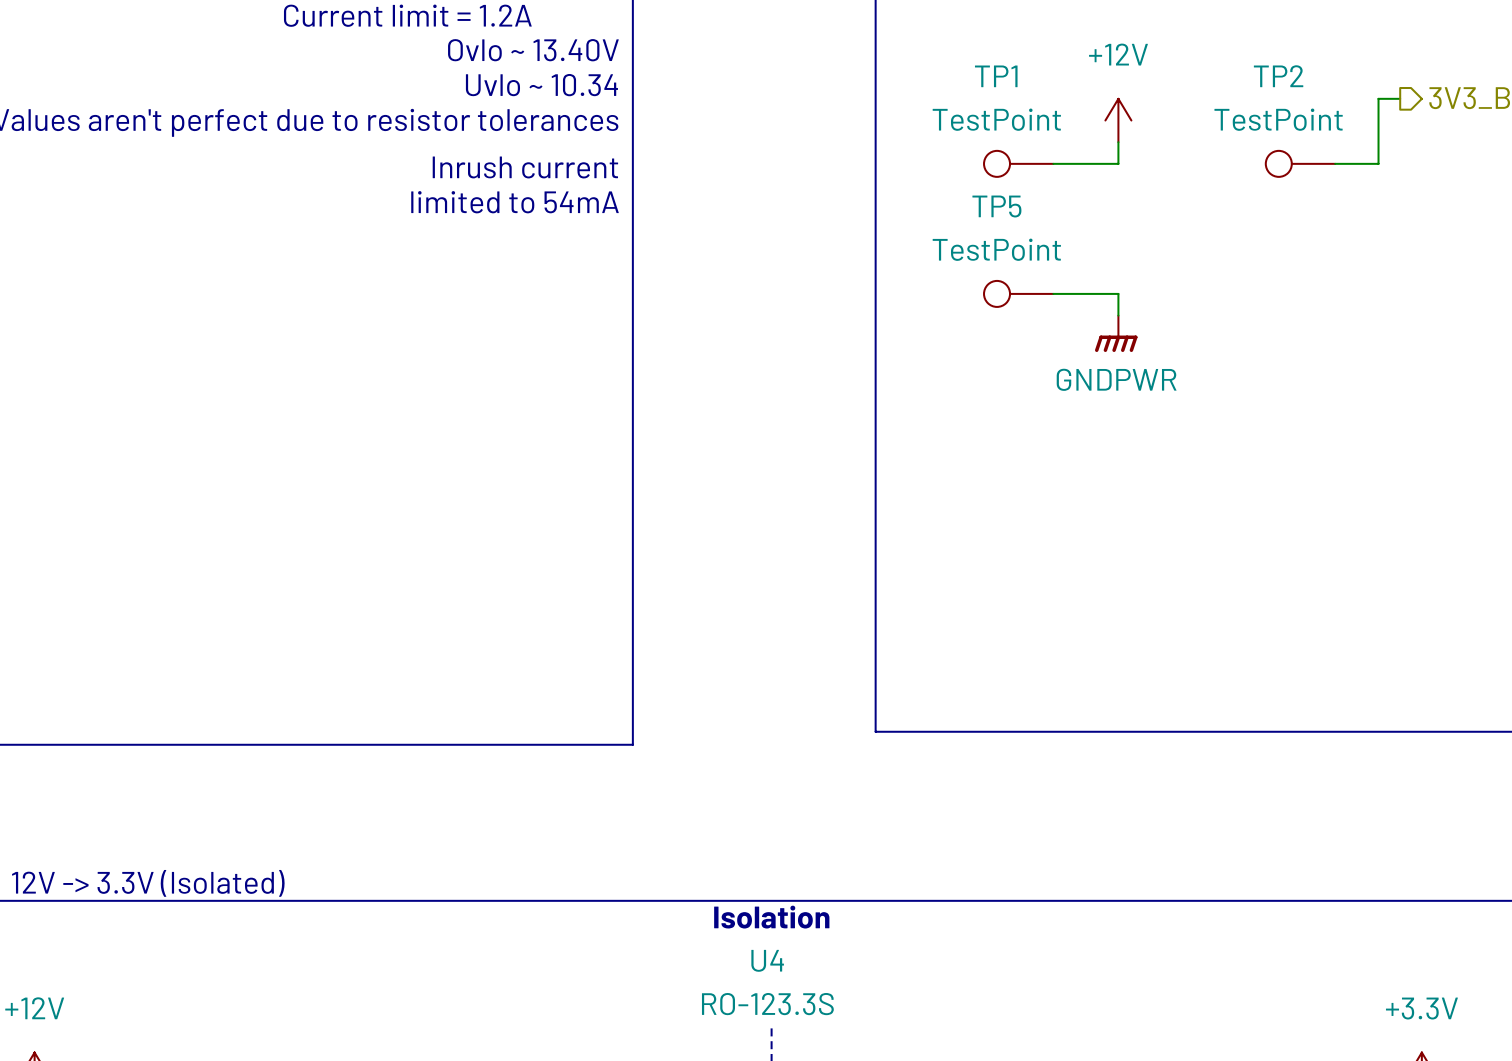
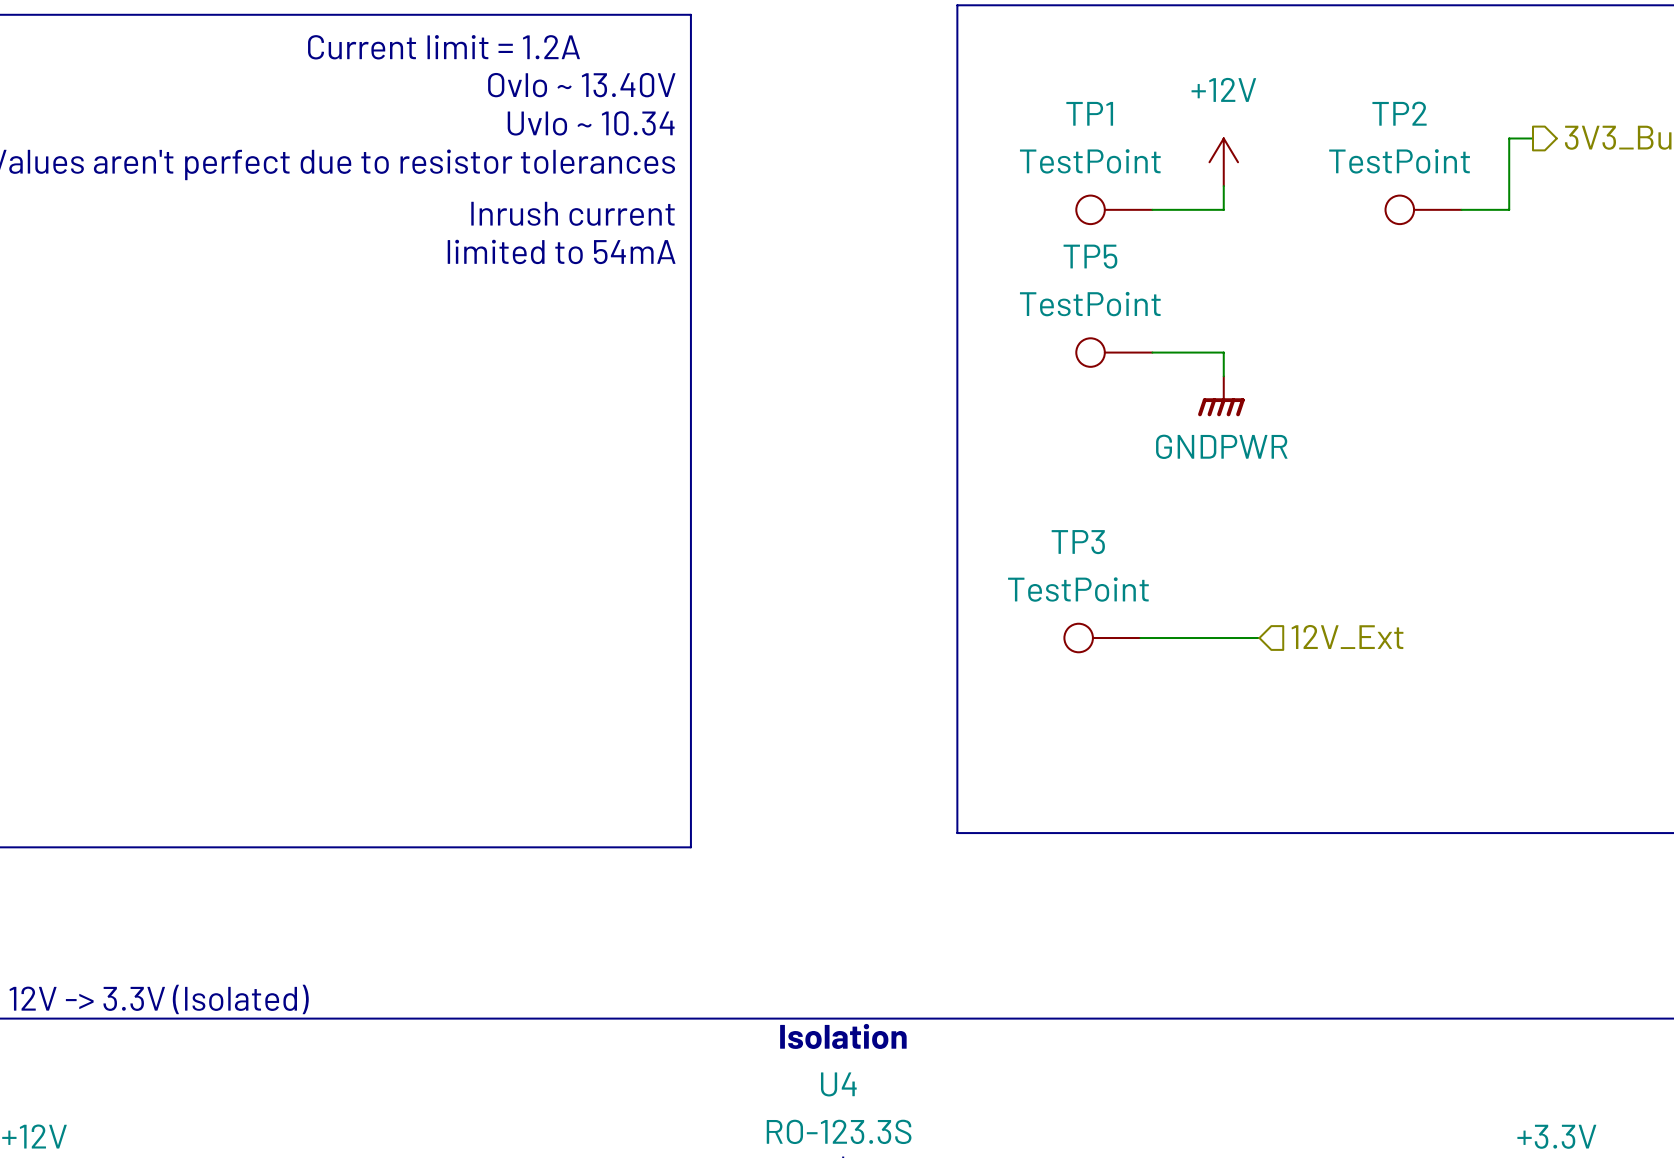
hierarchical label: none -> 12V_Ext (1347, 637)
TP3: none -> TestPoint (1102, 638)
wire: none -> (1140, 638) (1259, 638)

